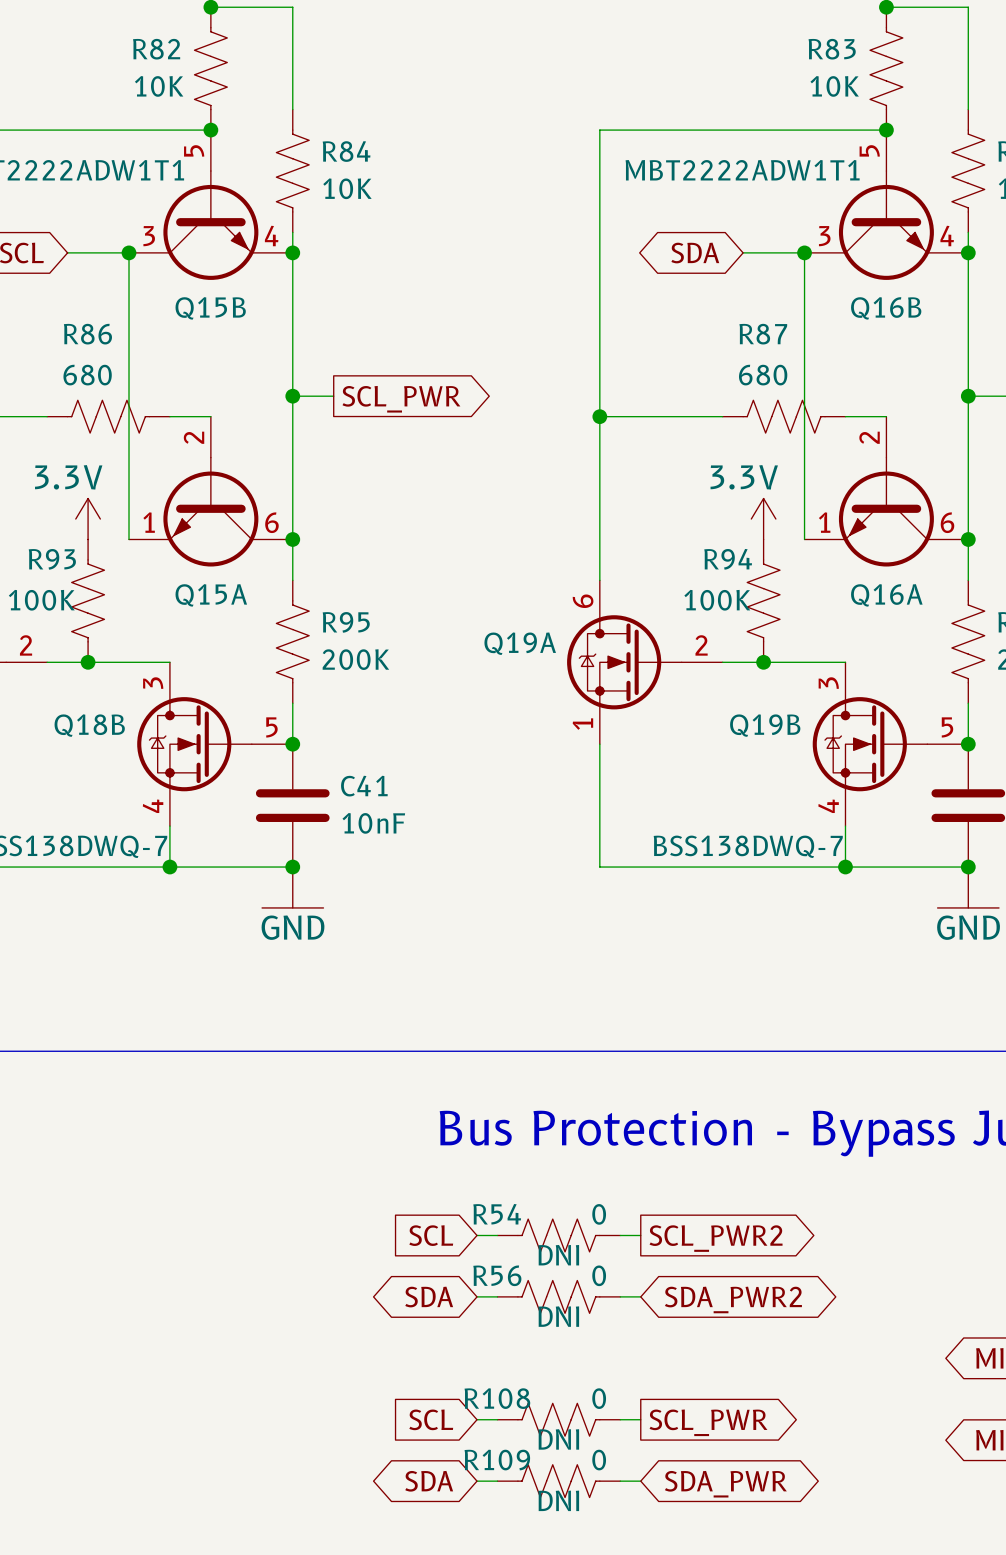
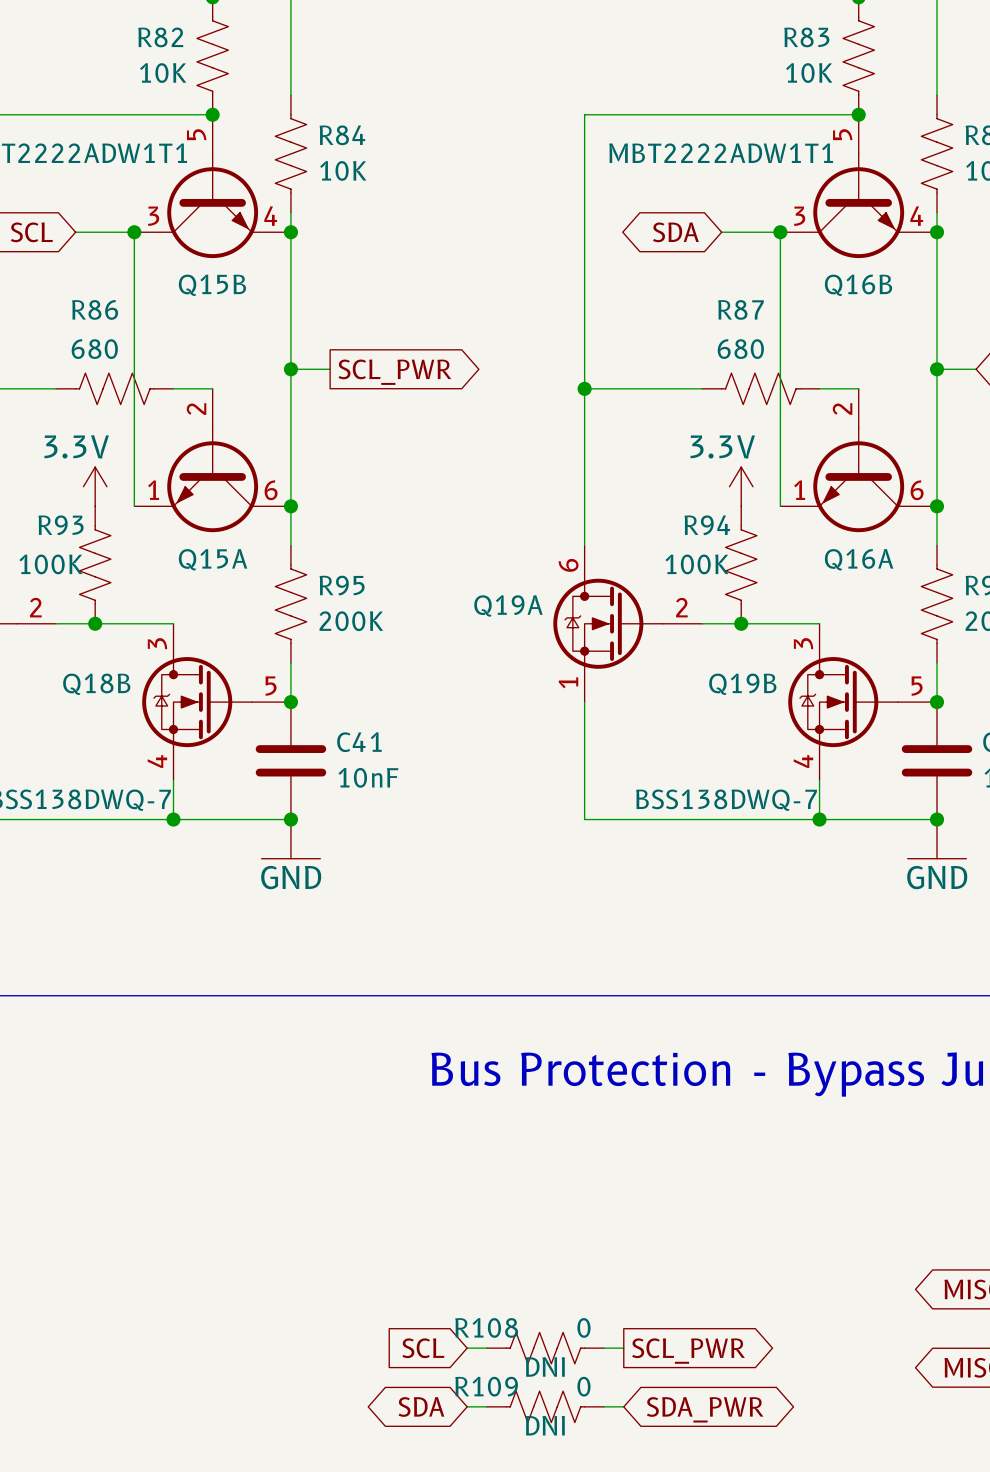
global label: SCL (431, 1235) -> none
wire: (477, 1235) (497, 1235) -> none
R54: 0 (558, 1235) -> none
wire: (620, 1235) (640, 1235) -> none
global label: SCL_PWR2 (716, 1238) -> none
wire: (477, 1296) (497, 1296) -> none
R56: 0 (558, 1296) -> none
wire: (620, 1296) (640, 1296) -> none
global label: SDA (429, 1297) -> none
global label: SDA_PWR2 (733, 1299) -> none

